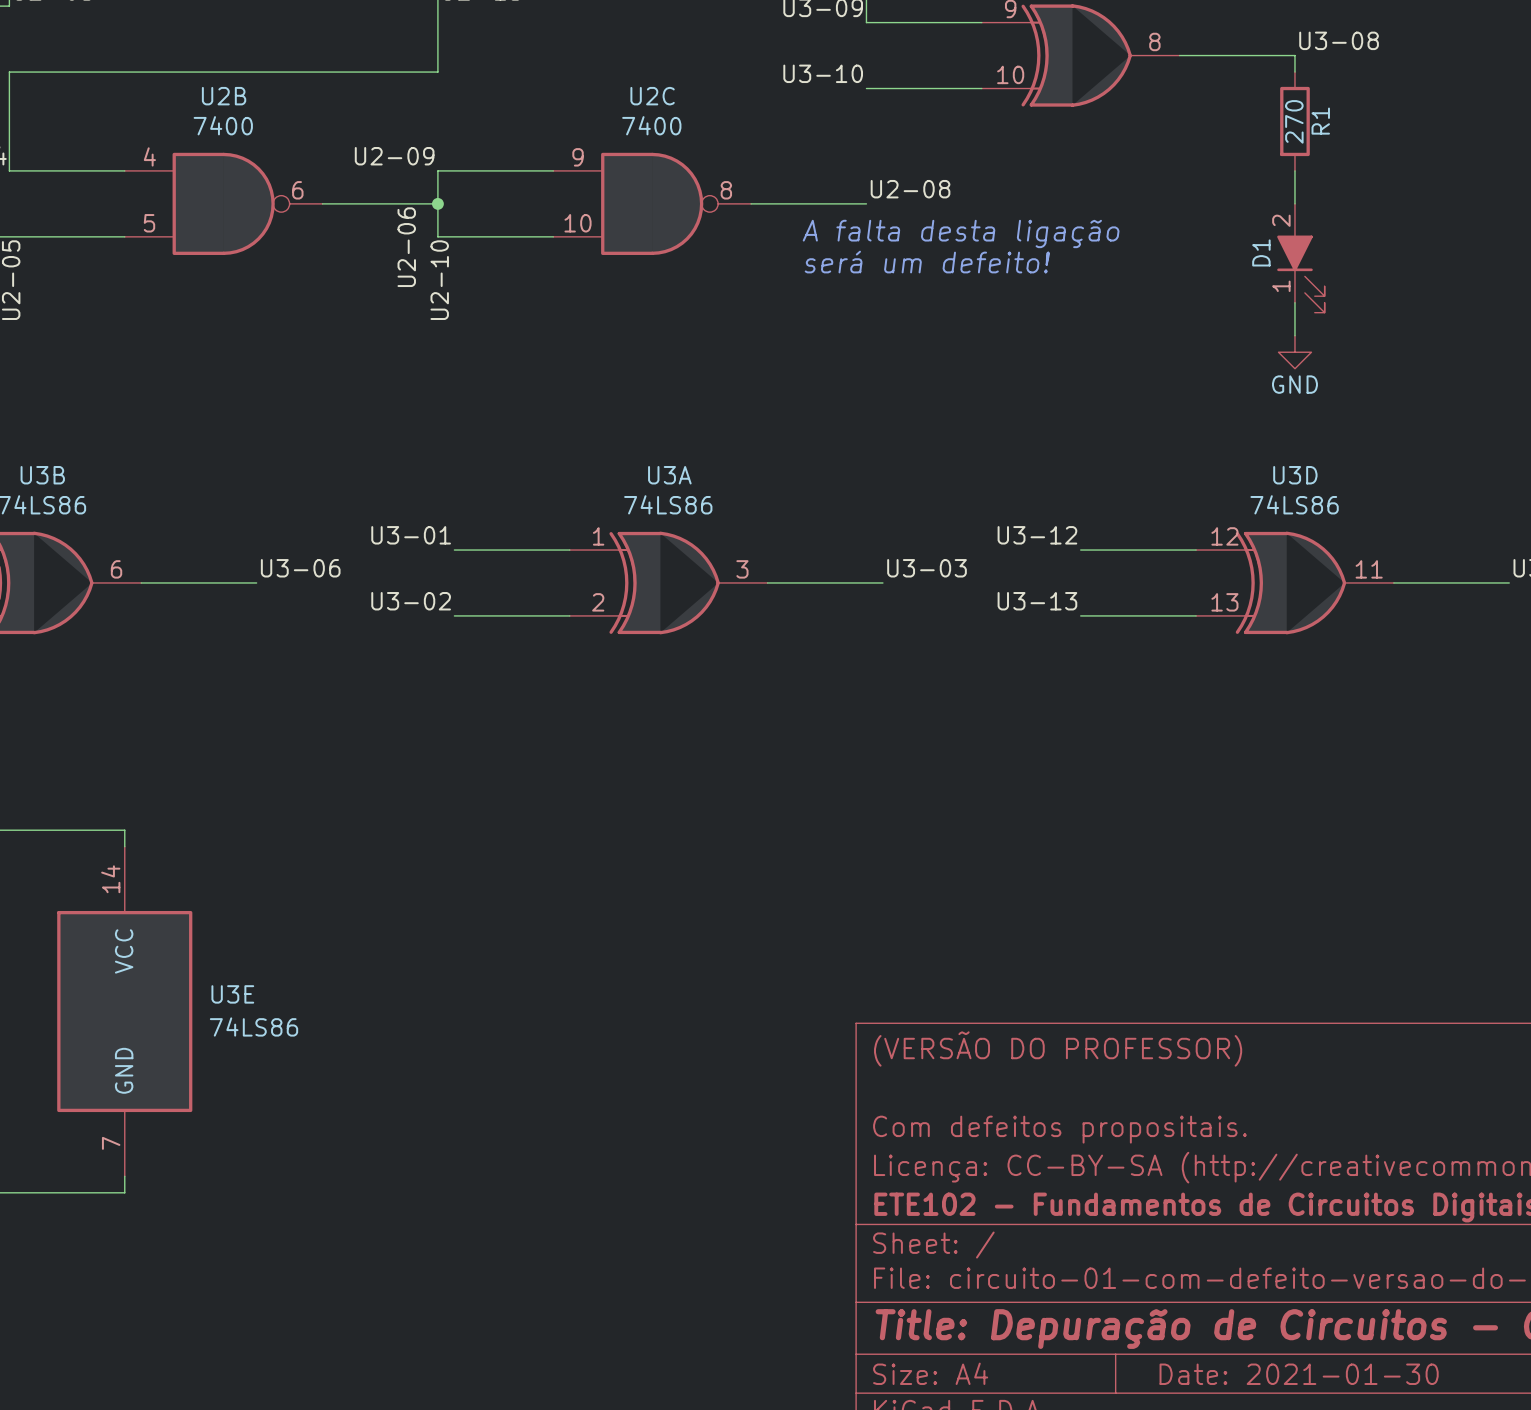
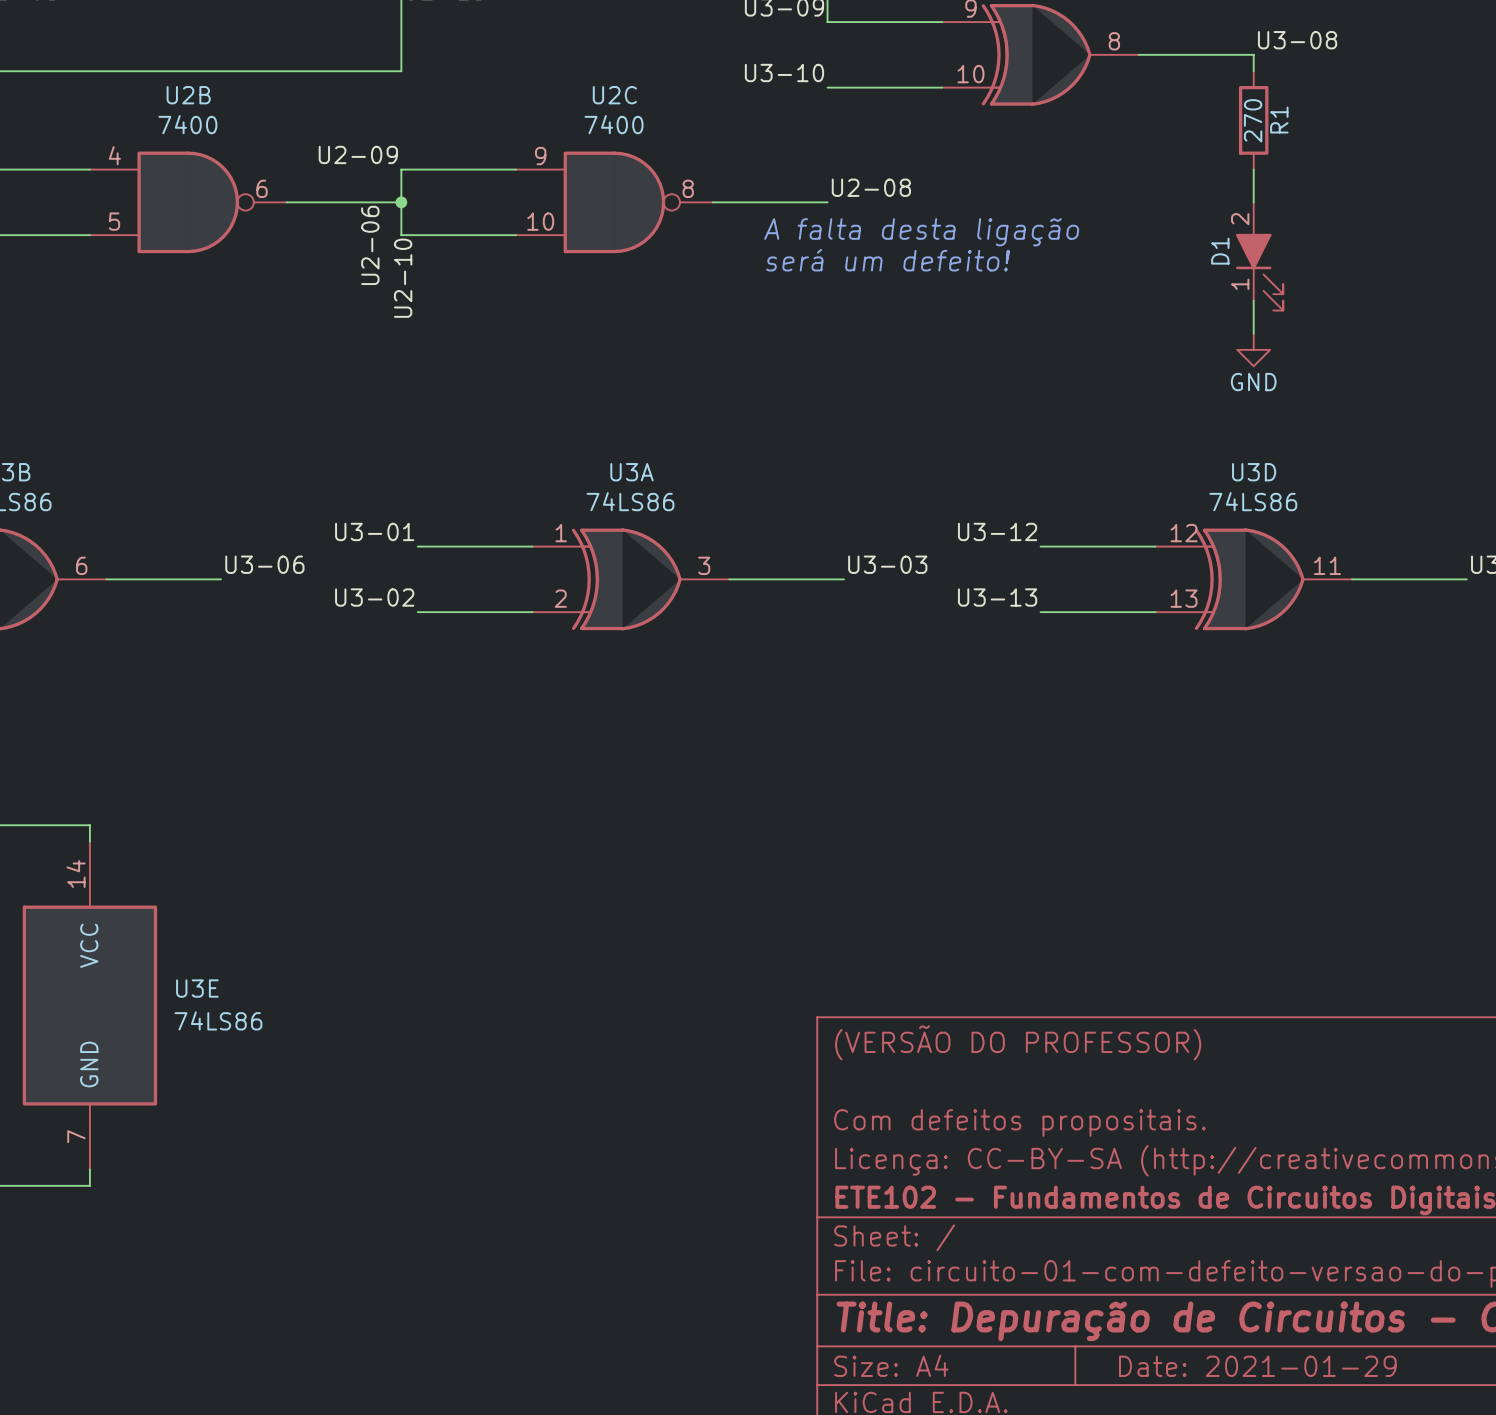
title block: Date: 2021-01-30 (1299, 1374) -> Date: 2021-01-29 (1257, 1366)

